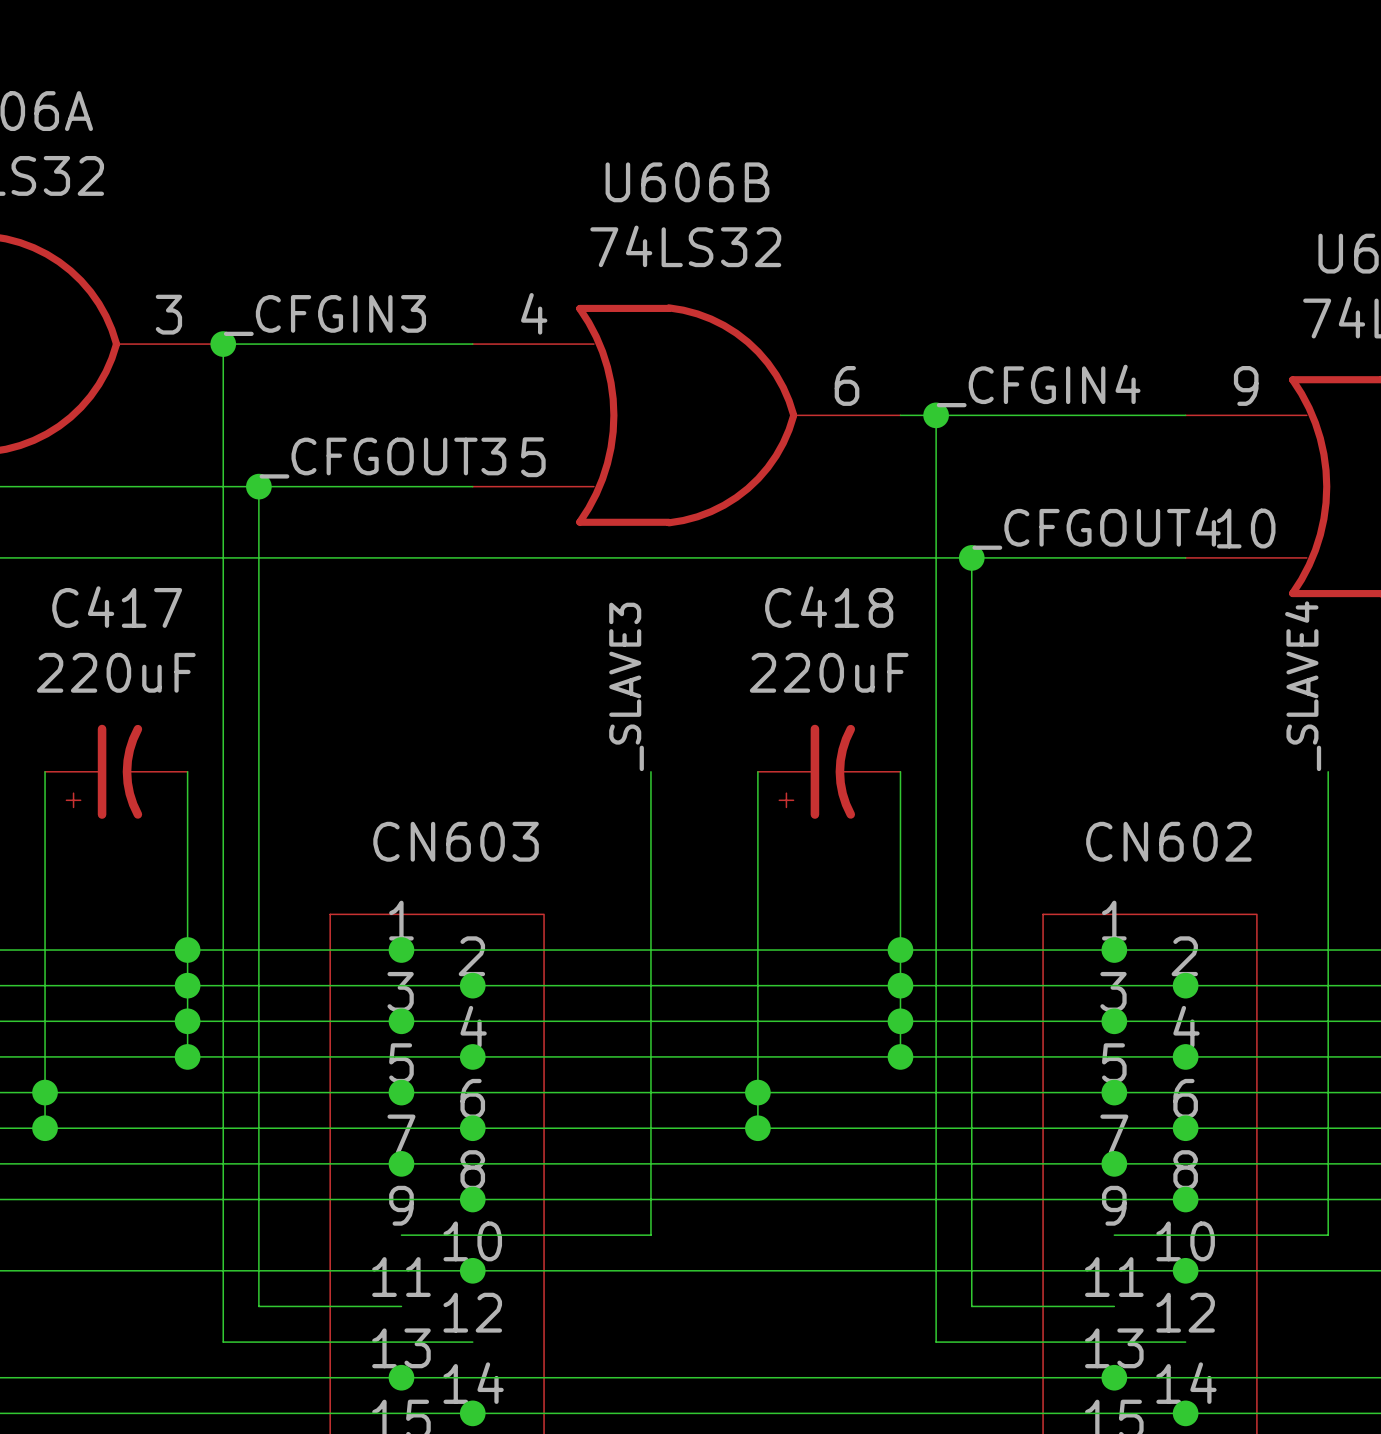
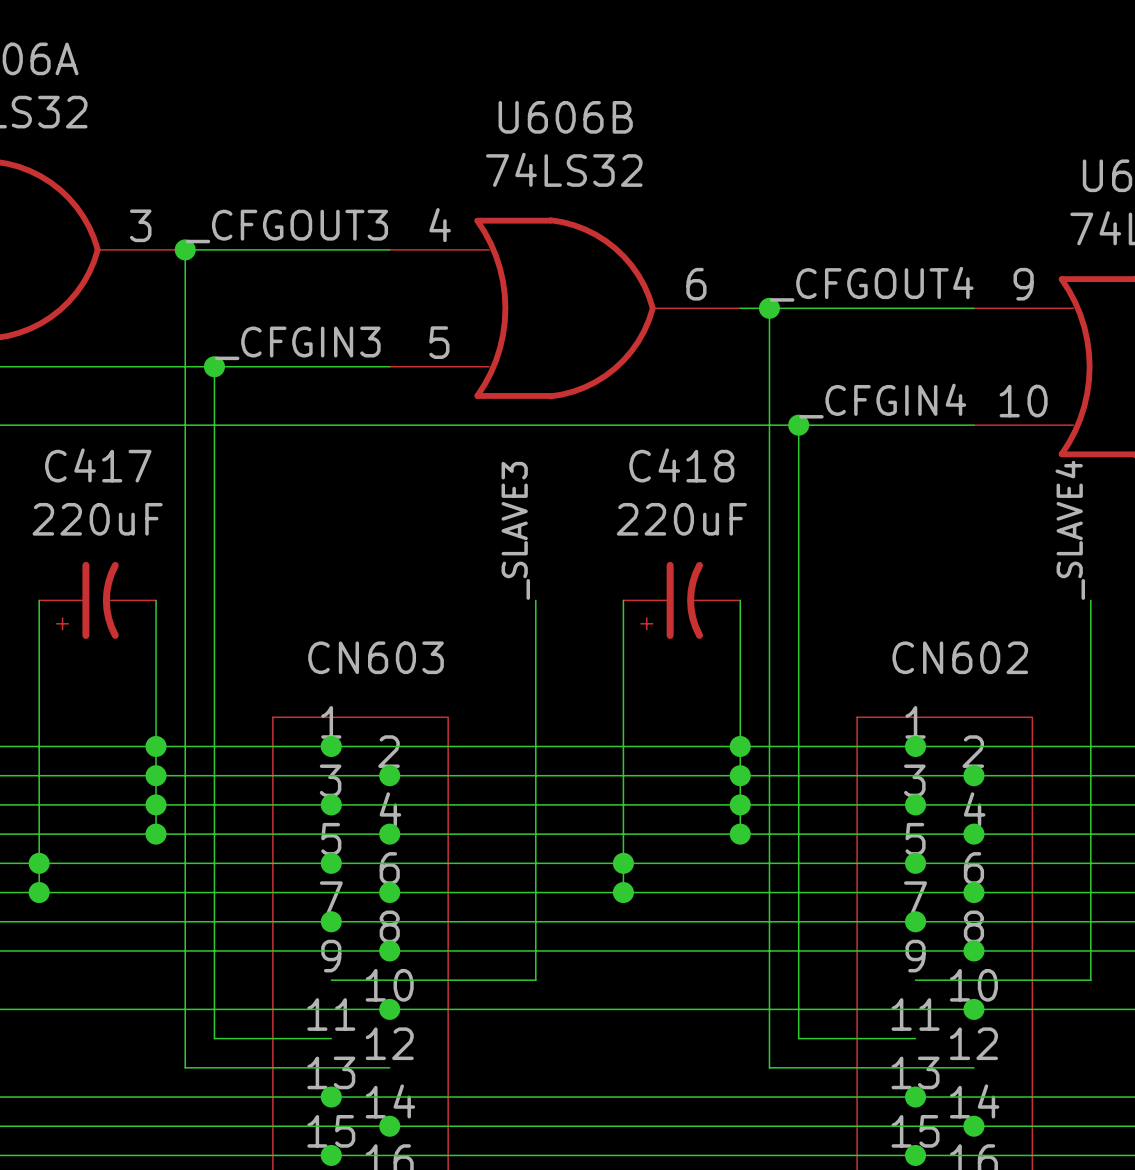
label: _CFGIN3 (324, 315) -> _CFGOUT3 (286, 226)
label: _CFGIN4 (1038, 386) -> _CFGOUT4 (871, 284)
label: _CFGOUT3 (382, 458) -> _CFGIN3 (297, 343)
label: _CFGOUT4 (1096, 528) -> _CFGIN4 (882, 401)

